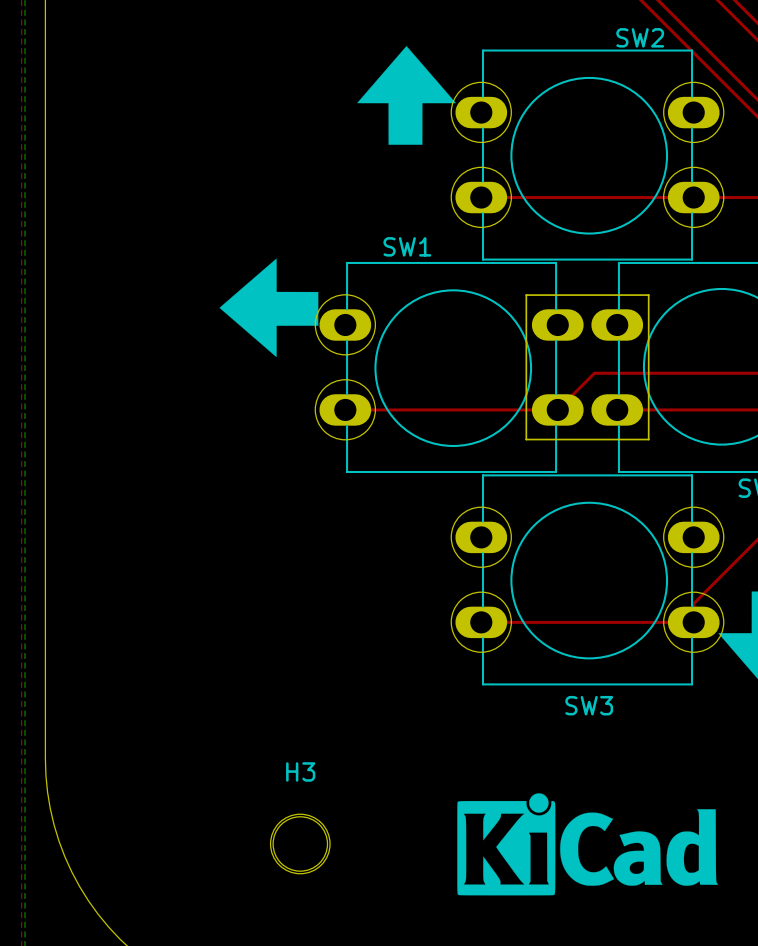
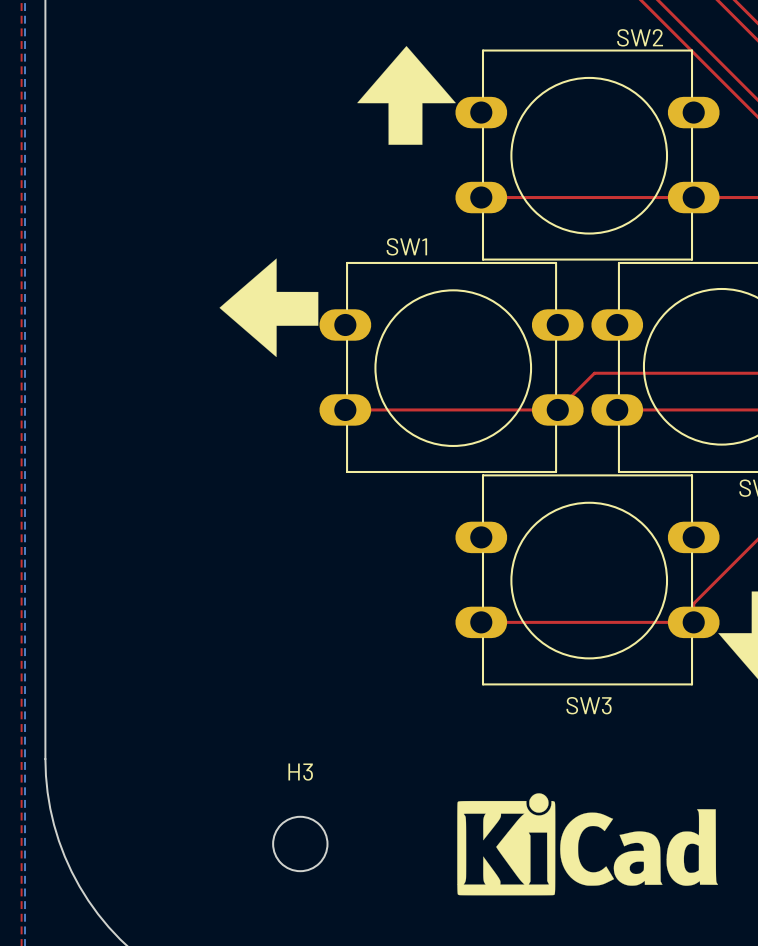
round board edge: [450, 82, 512, 143] -> none
round board edge: [663, 82, 725, 143] -> none
round board edge: [450, 167, 512, 228] -> none
round board edge: [663, 167, 725, 228] -> none
round board edge: [314, 294, 376, 356] -> none
board edge: (526, 295) (526, 439) (648, 439) (648, 295) (526, 295) -> none
round board edge: [314, 379, 376, 441] -> none
round board edge: [450, 506, 512, 568] -> none
round board edge: [663, 506, 725, 568] -> none
round board edge: [450, 591, 512, 653] -> none
round board edge: [663, 591, 725, 653] -> none
round board edge: [270, 813, 331, 875] -> none

